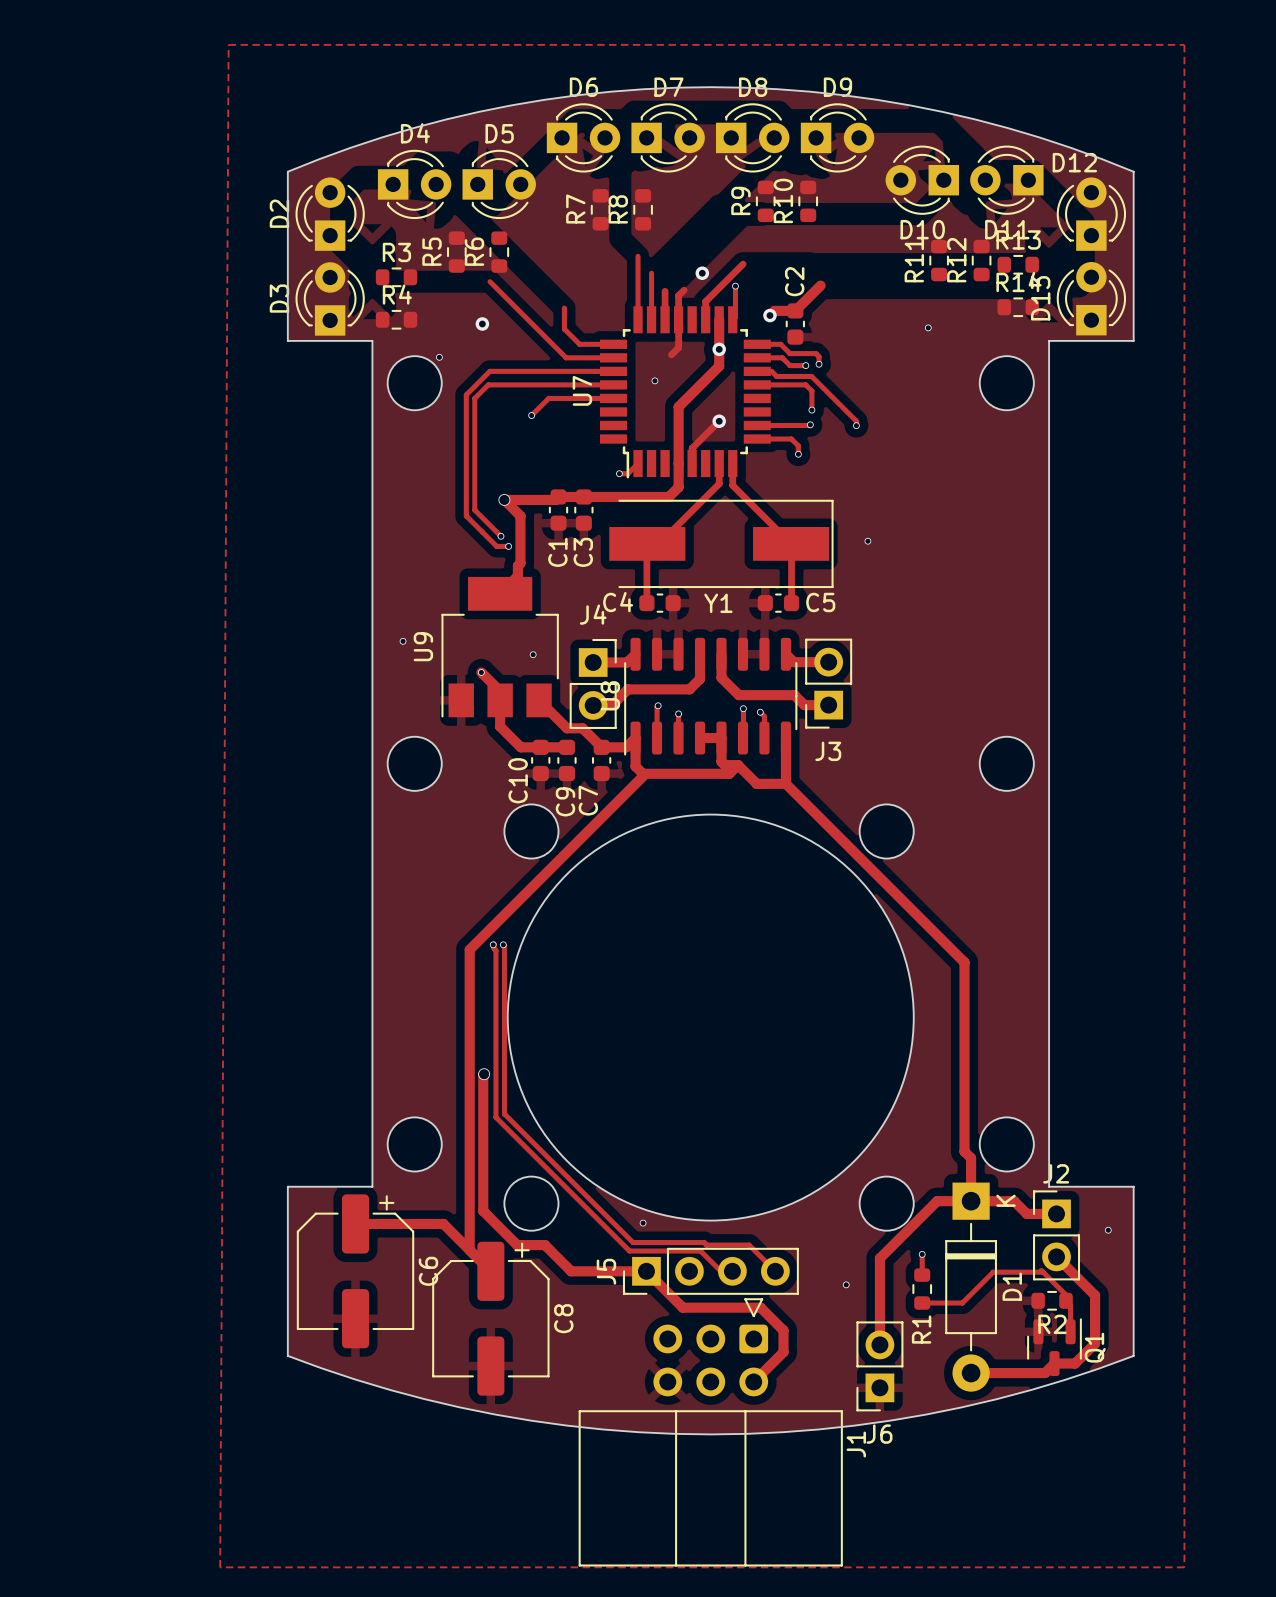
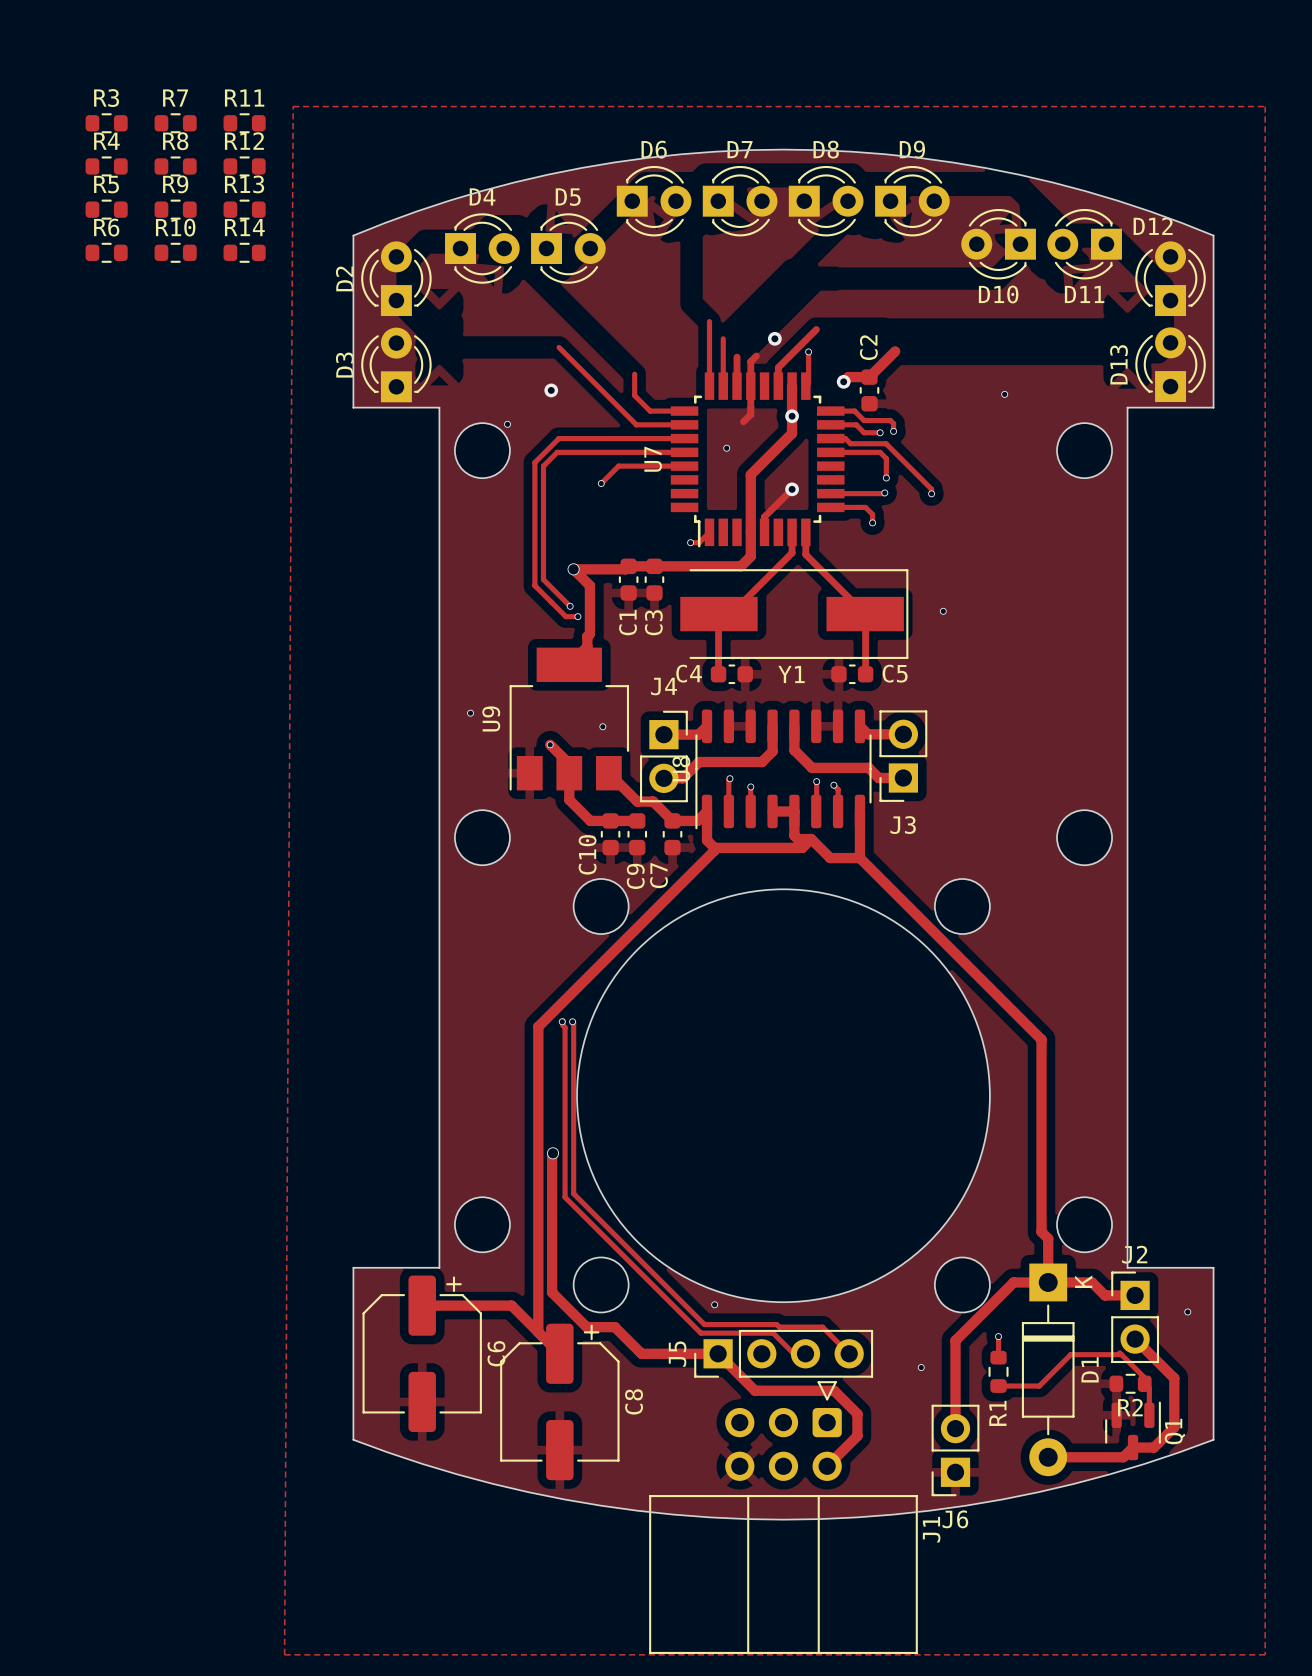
R9 rotation: 0° (765, 201) -> 90° clockwise (175, 209)
R9 position: (765, 201) -> (175, 209)
R10 rotation: 0° (808, 201) -> 90° clockwise (175, 252)
R10 position: (808, 201) -> (175, 252)
R7 rotation: 0° (600, 209) -> 90° clockwise (175, 123)
R7 position: (600, 209) -> (175, 123)
R8 rotation: 0° (643, 209) -> 90° clockwise (175, 166)
R8 position: (643, 209) -> (175, 166)
R5 rotation: 0° (456, 252) -> 90° clockwise (106, 209)
R5 position: (456, 252) -> (106, 209)
R6 rotation: 0° (499, 252) -> 90° clockwise (106, 252)
R6 position: (499, 252) -> (106, 252)
R11 rotation: 0° (939, 260) -> 90° clockwise (244, 123)
R11 position: (939, 260) -> (244, 123)
R12 rotation: 0° (981, 260) -> 90° clockwise (244, 166)
R12 position: (981, 260) -> (244, 166)
R13 position: (1018, 264) -> (244, 209)
R3 position: (396, 277) -> (106, 123)
R14 position: (1018, 307) -> (244, 252)
R4 position: (396, 319) -> (106, 166)

